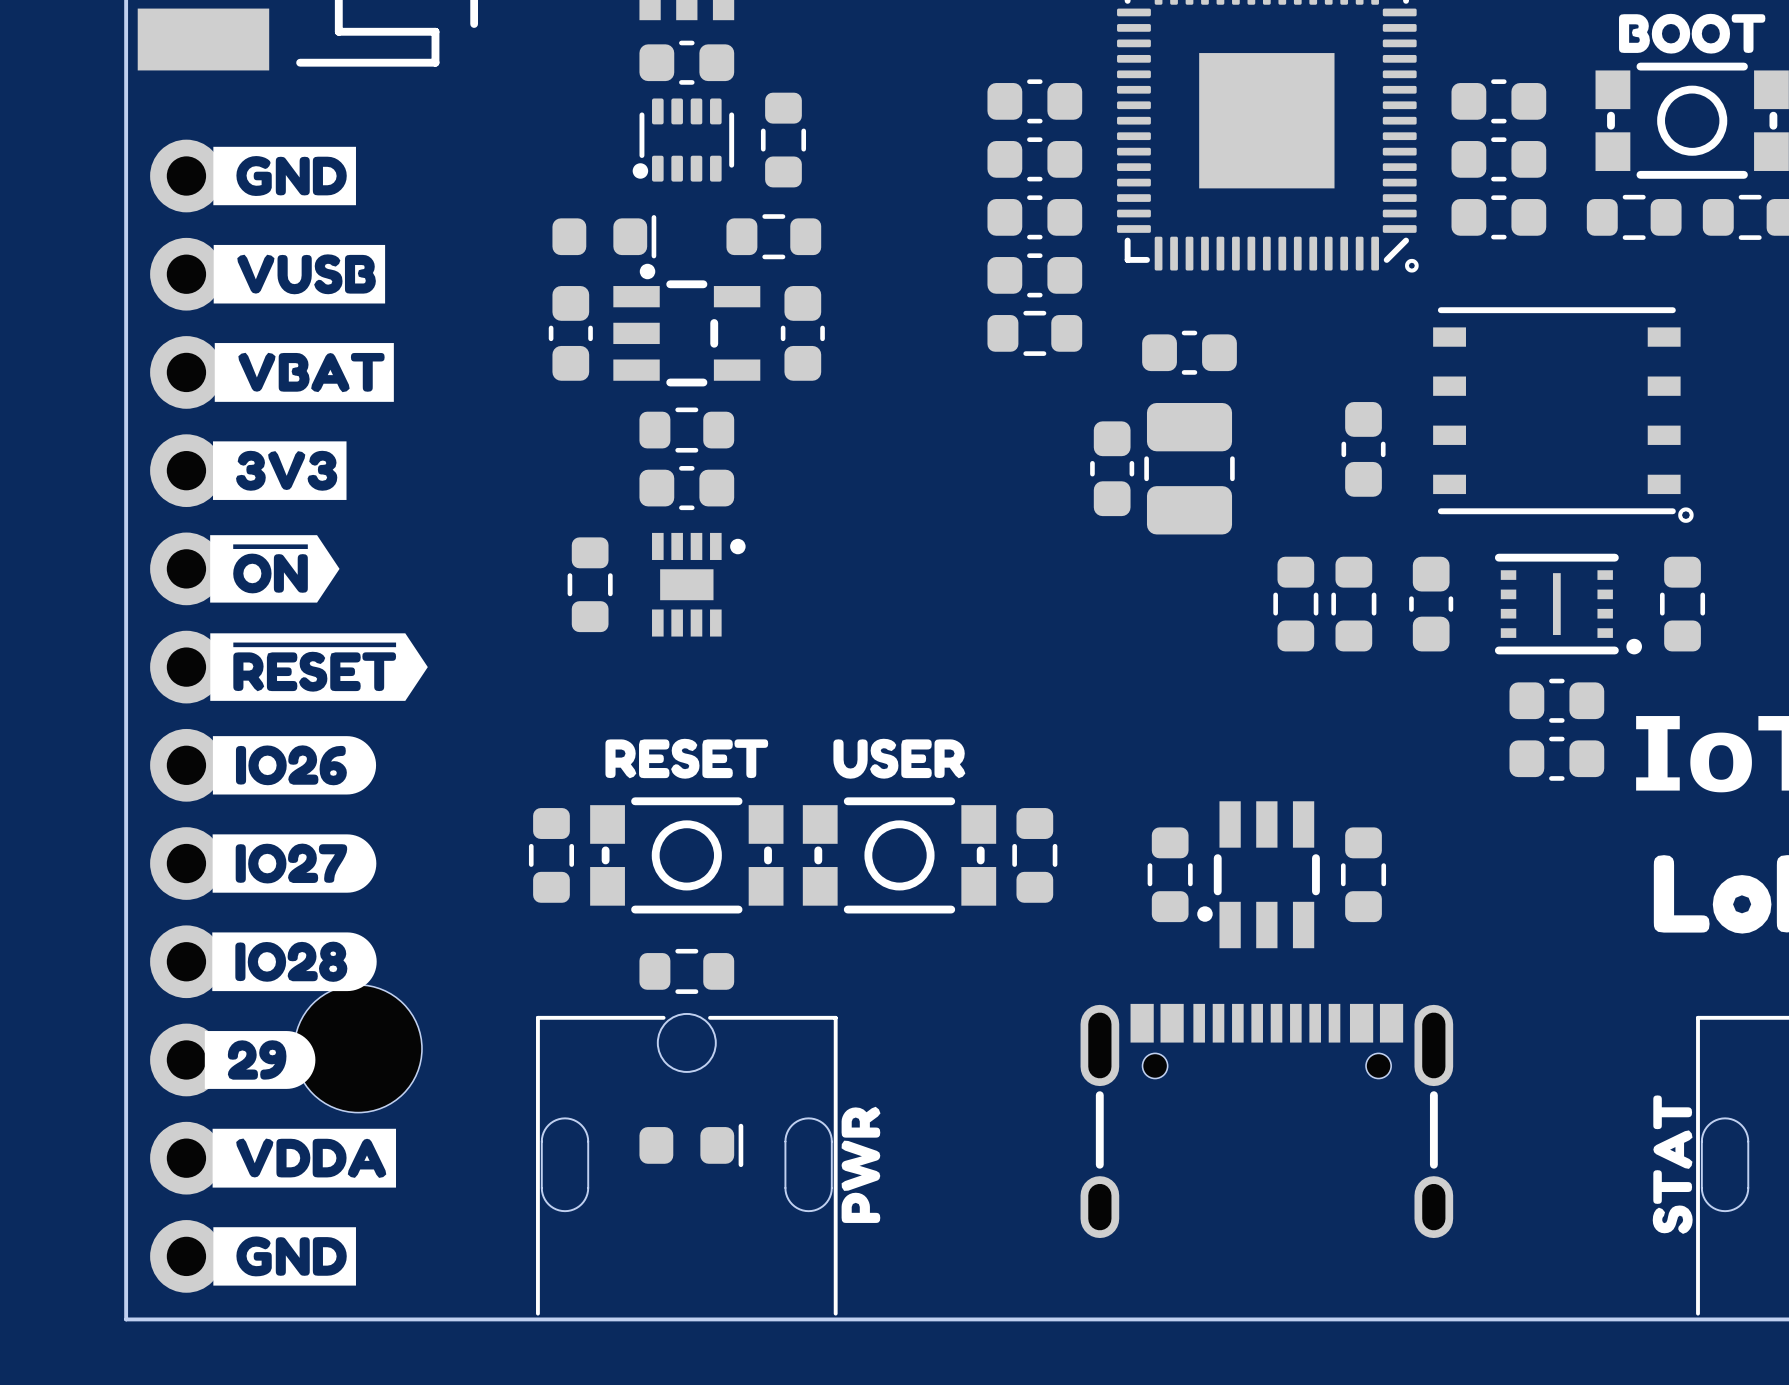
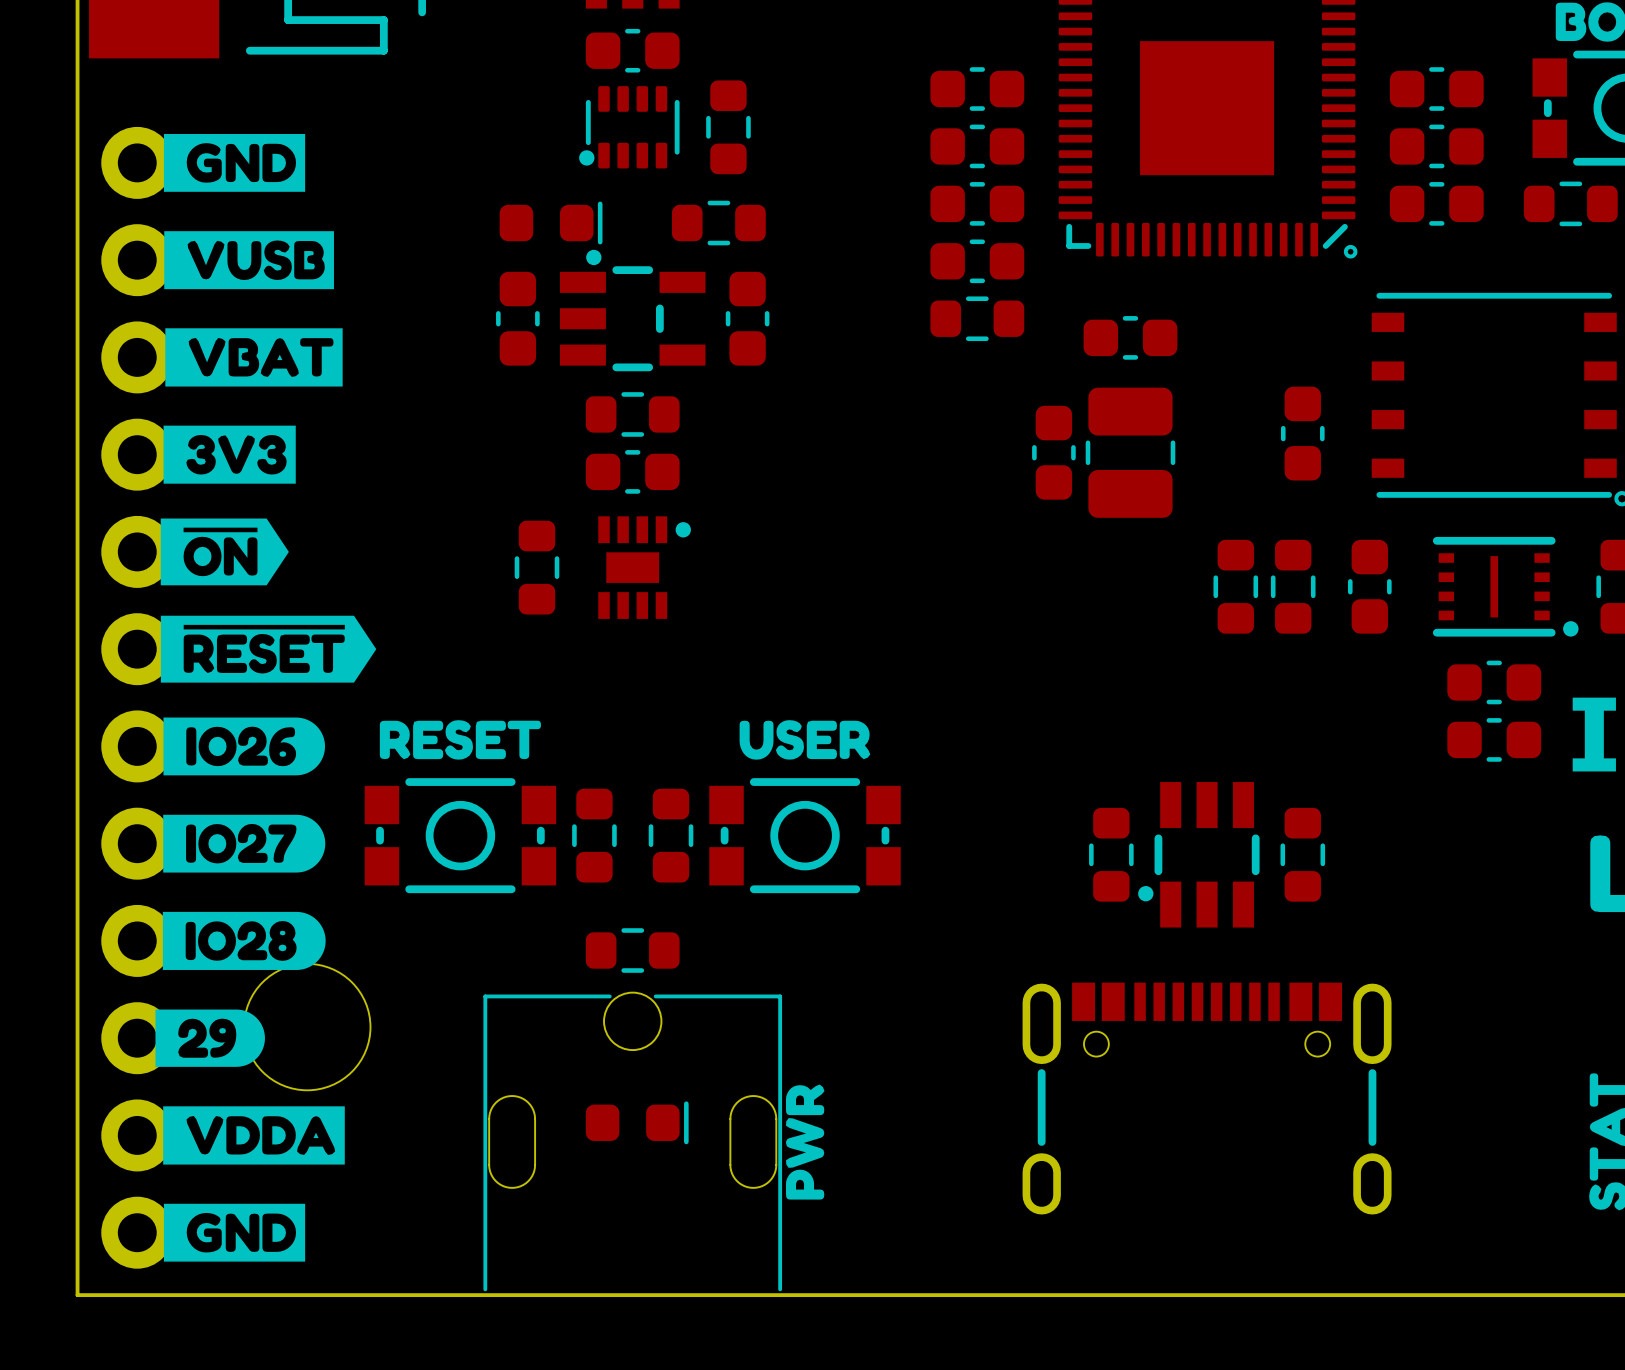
drawing position: (686, 758) -> (460, 739)
drawing position: (899, 758) -> (804, 739)
part footprint: [528, 808, 575, 903] -> [364, 778, 557, 894]
part: none -> (594, 835)
part: (686, 855) -> none
part: none -> (671, 835)
part position: (899, 855) -> (805, 835)
part: (1034, 855) -> none

